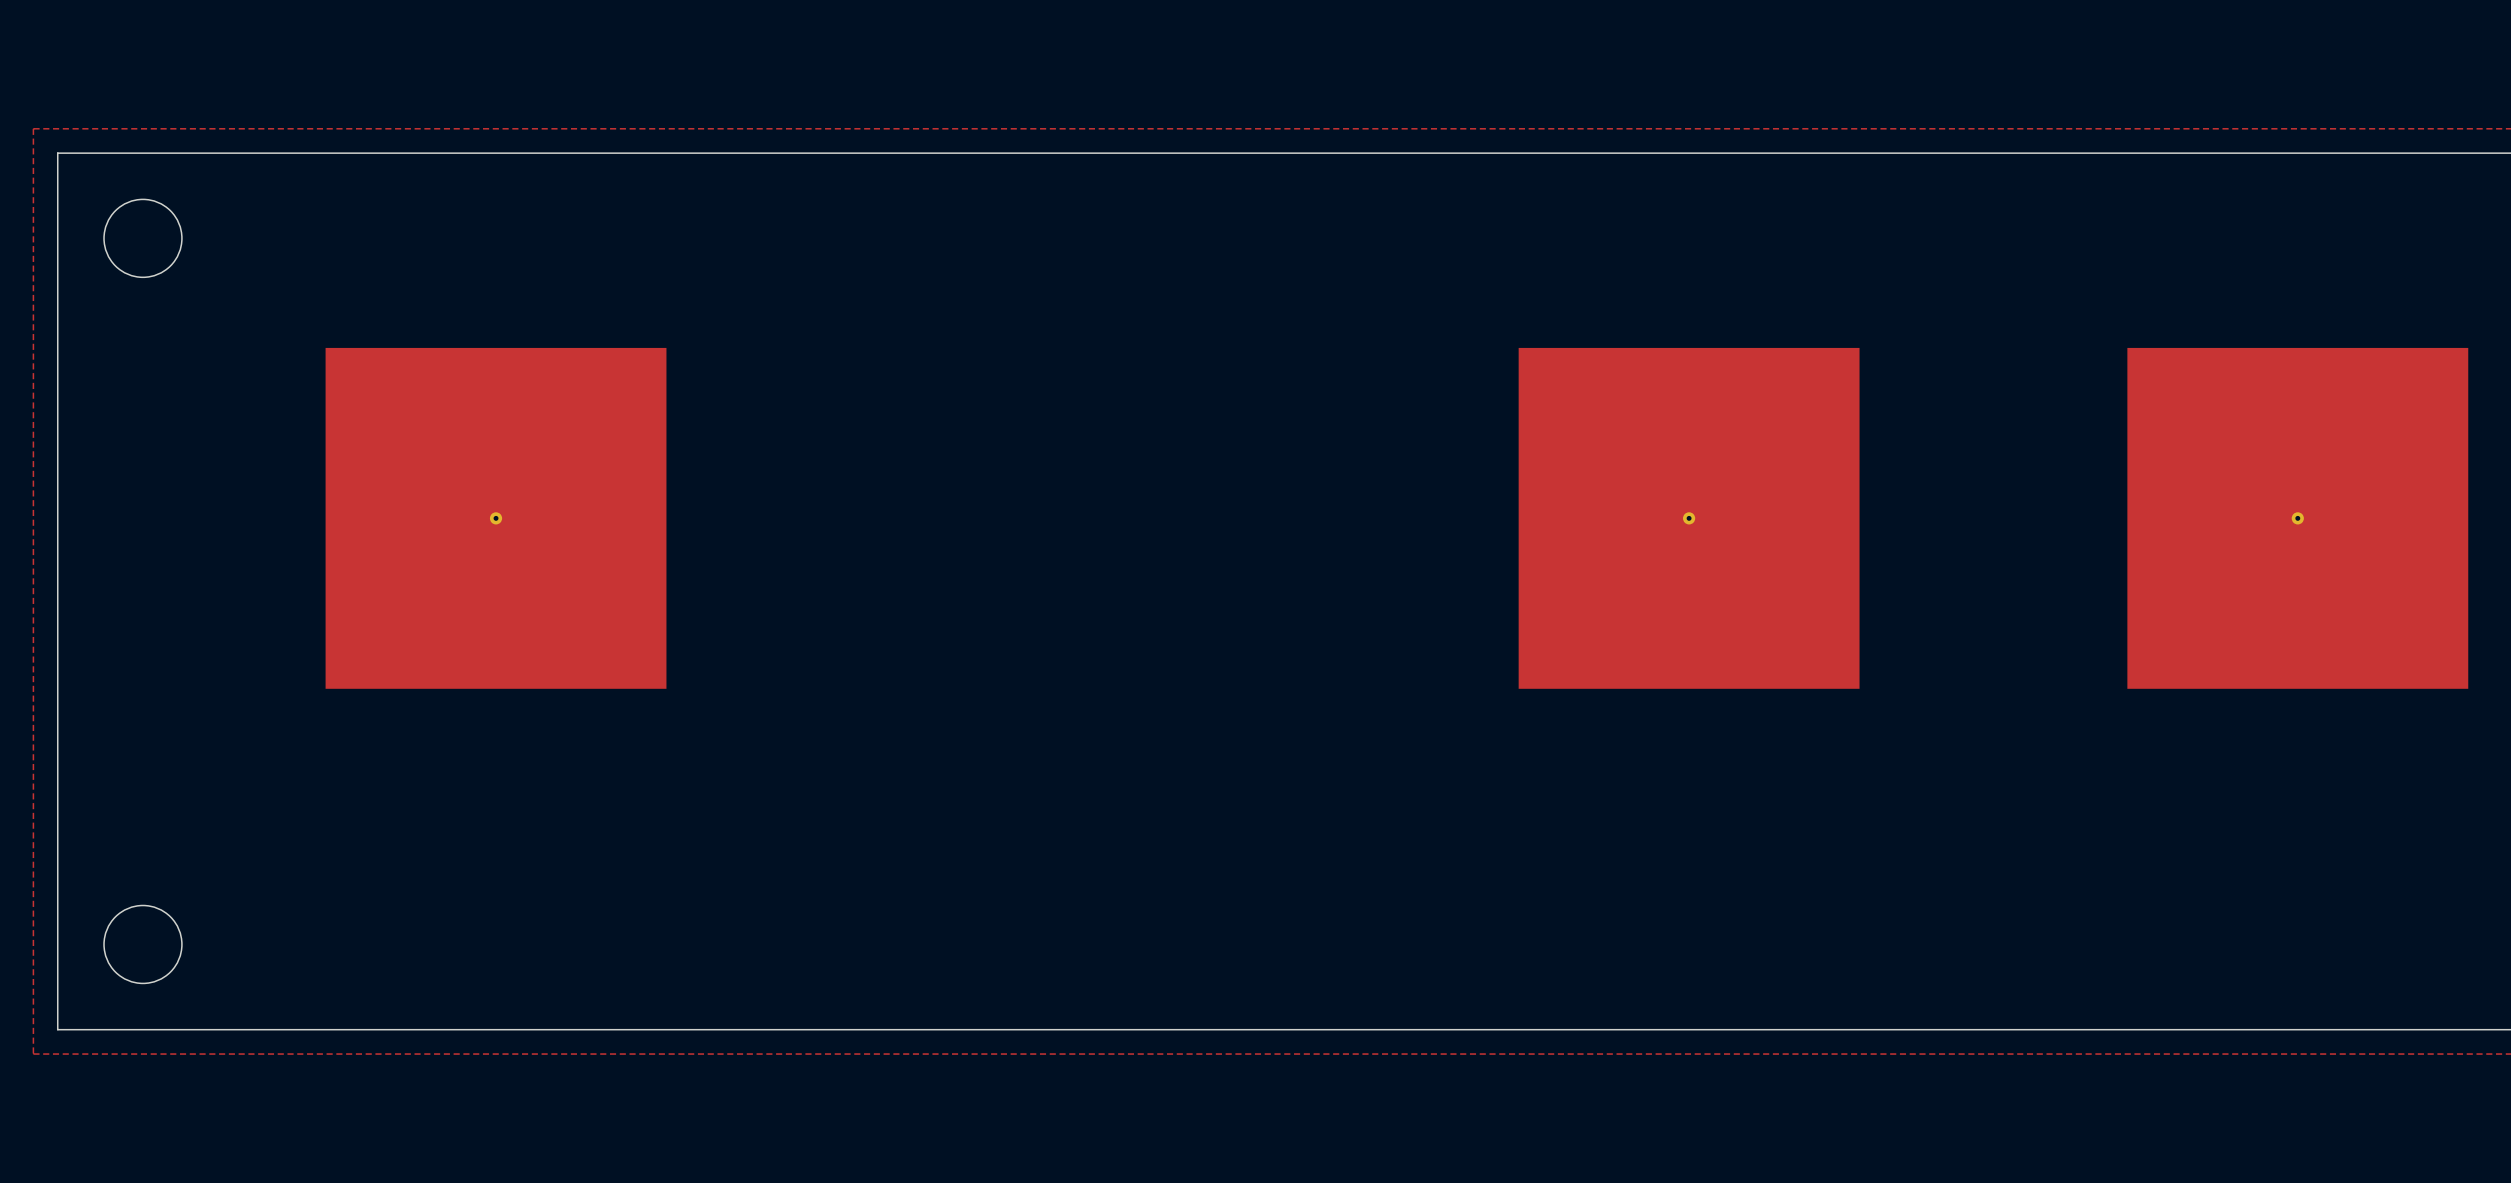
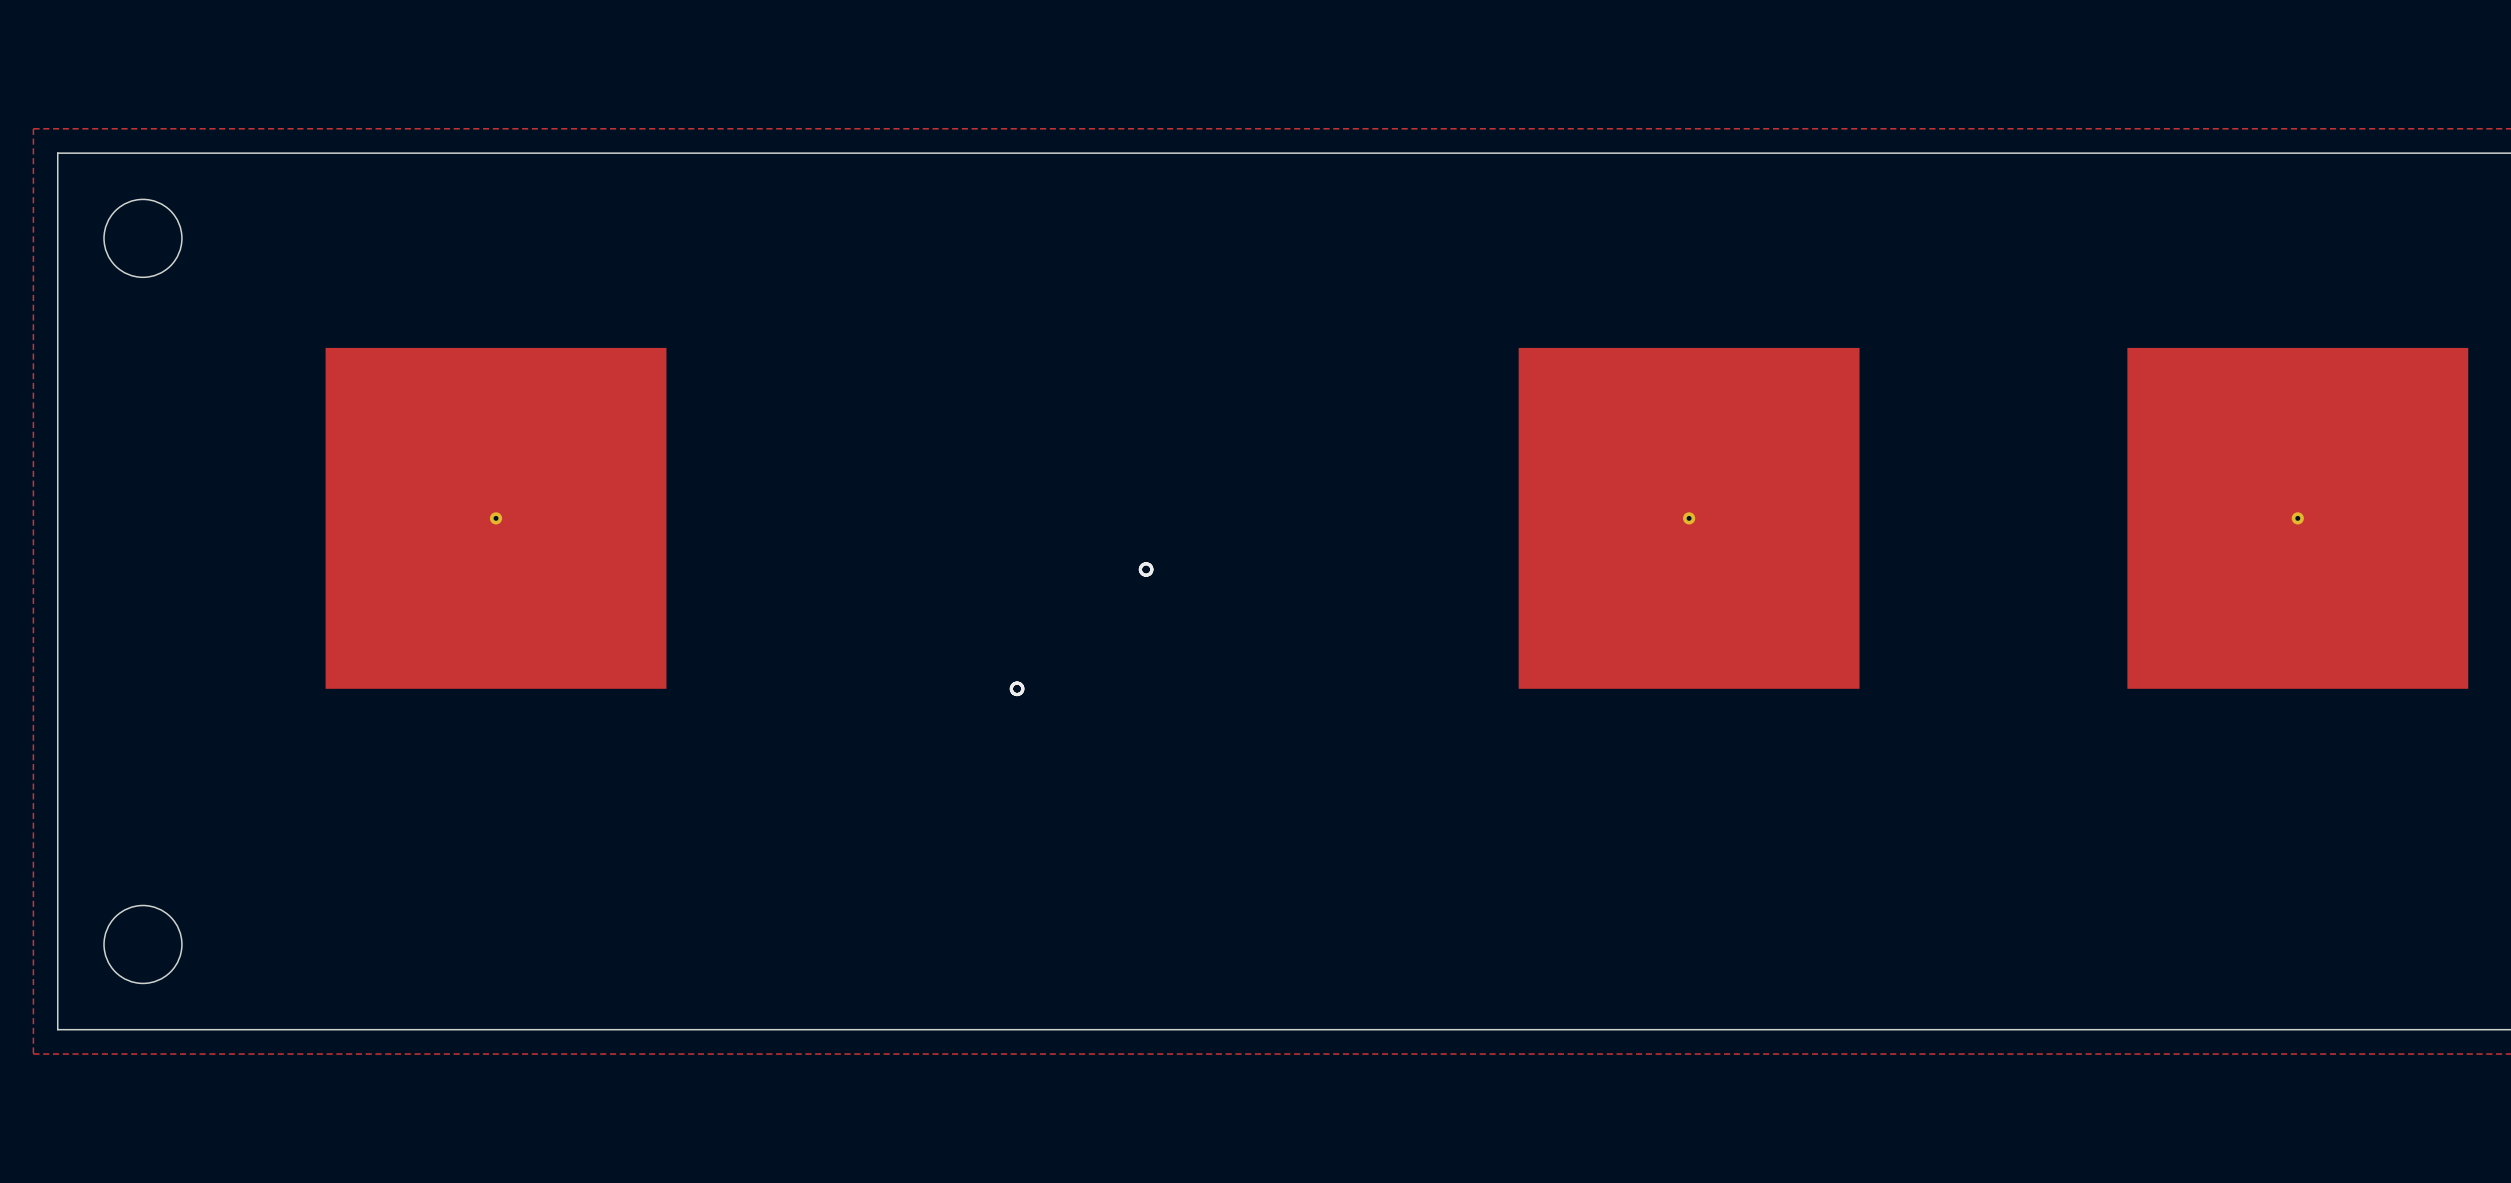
via: none -> (1146, 569)
via: none -> (1017, 688)

